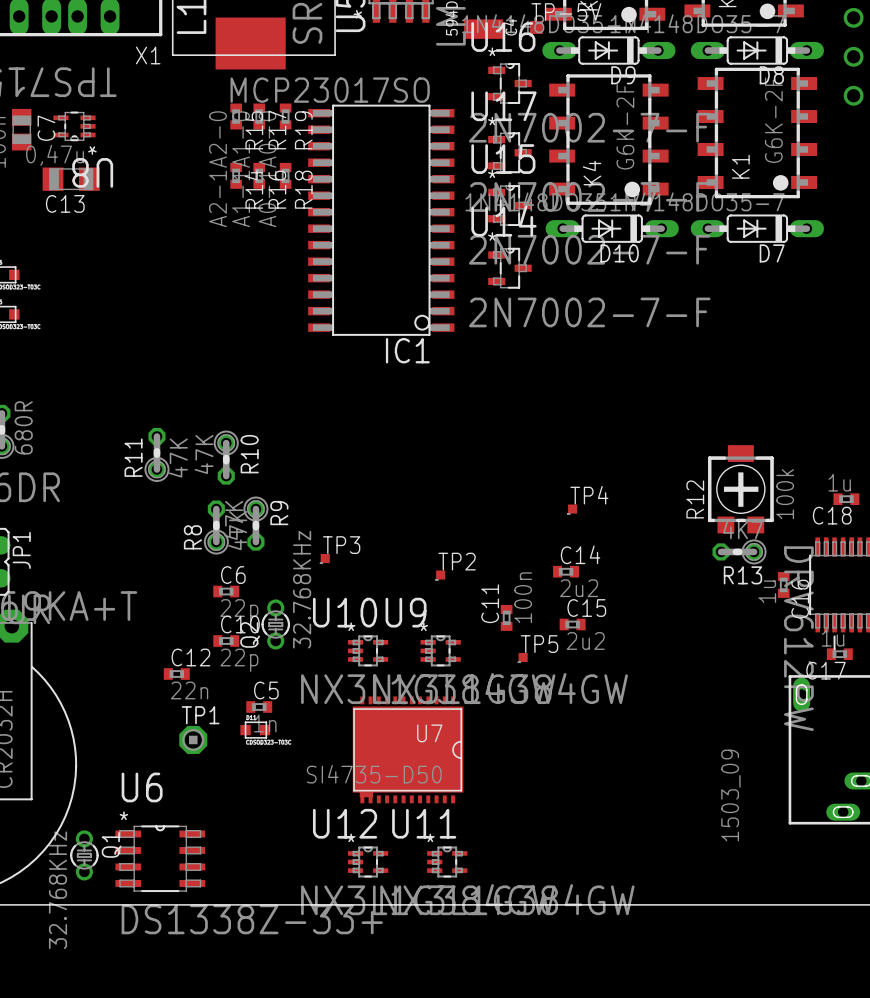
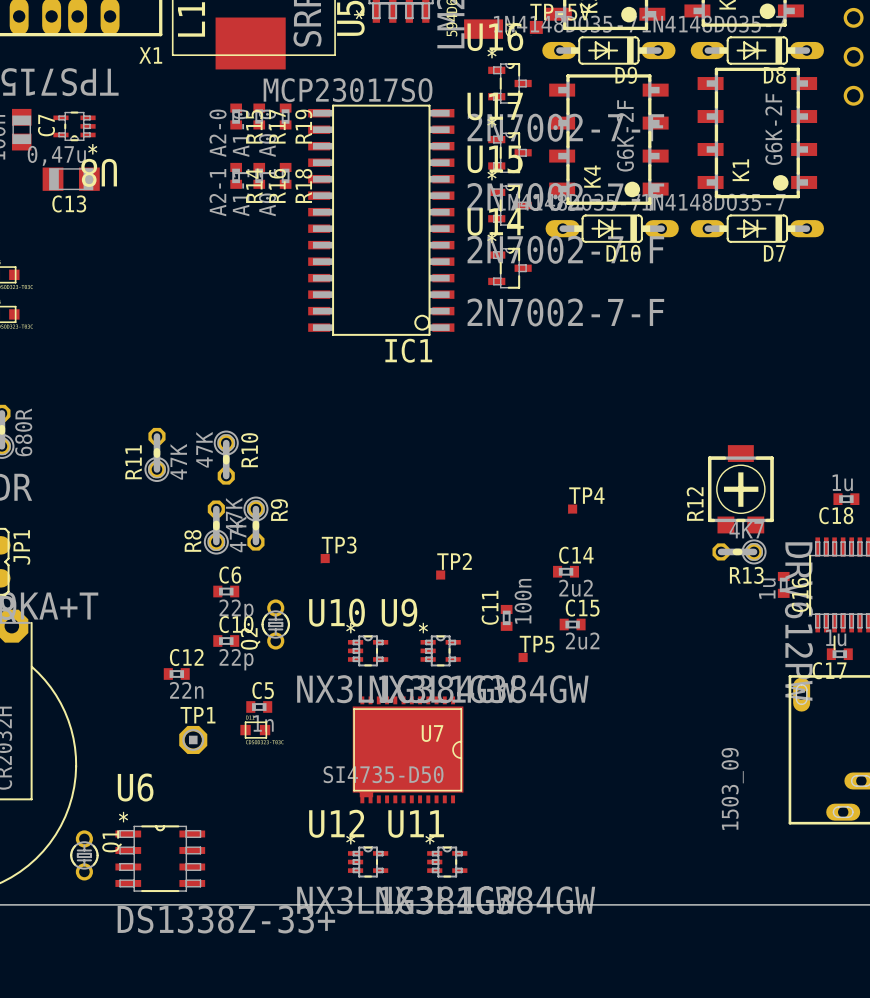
R12 value: 100k (785, 494) -> none
Q2 value: 32.768KHz (302, 589) -> none
Q1 value: 32.768KHz (58, 890) -> none

